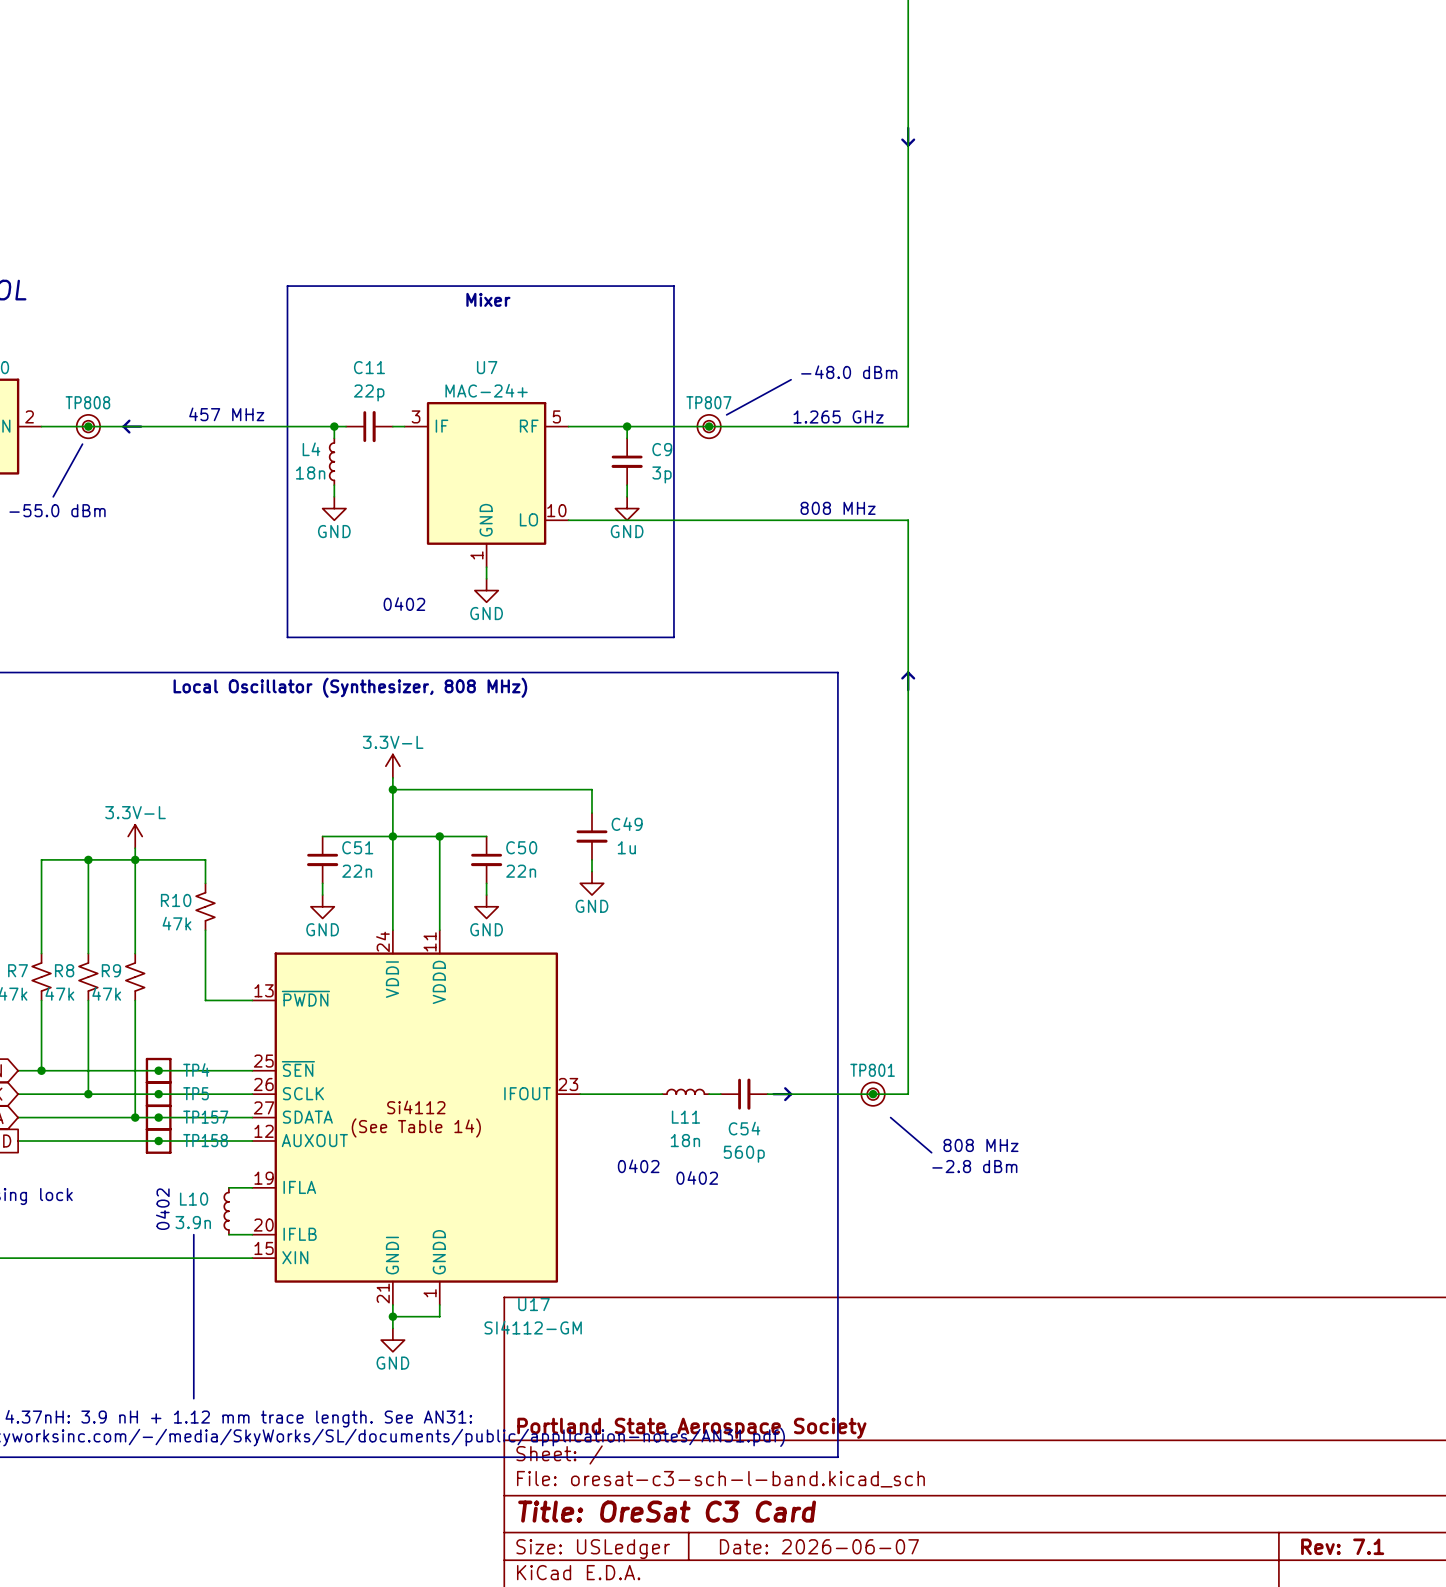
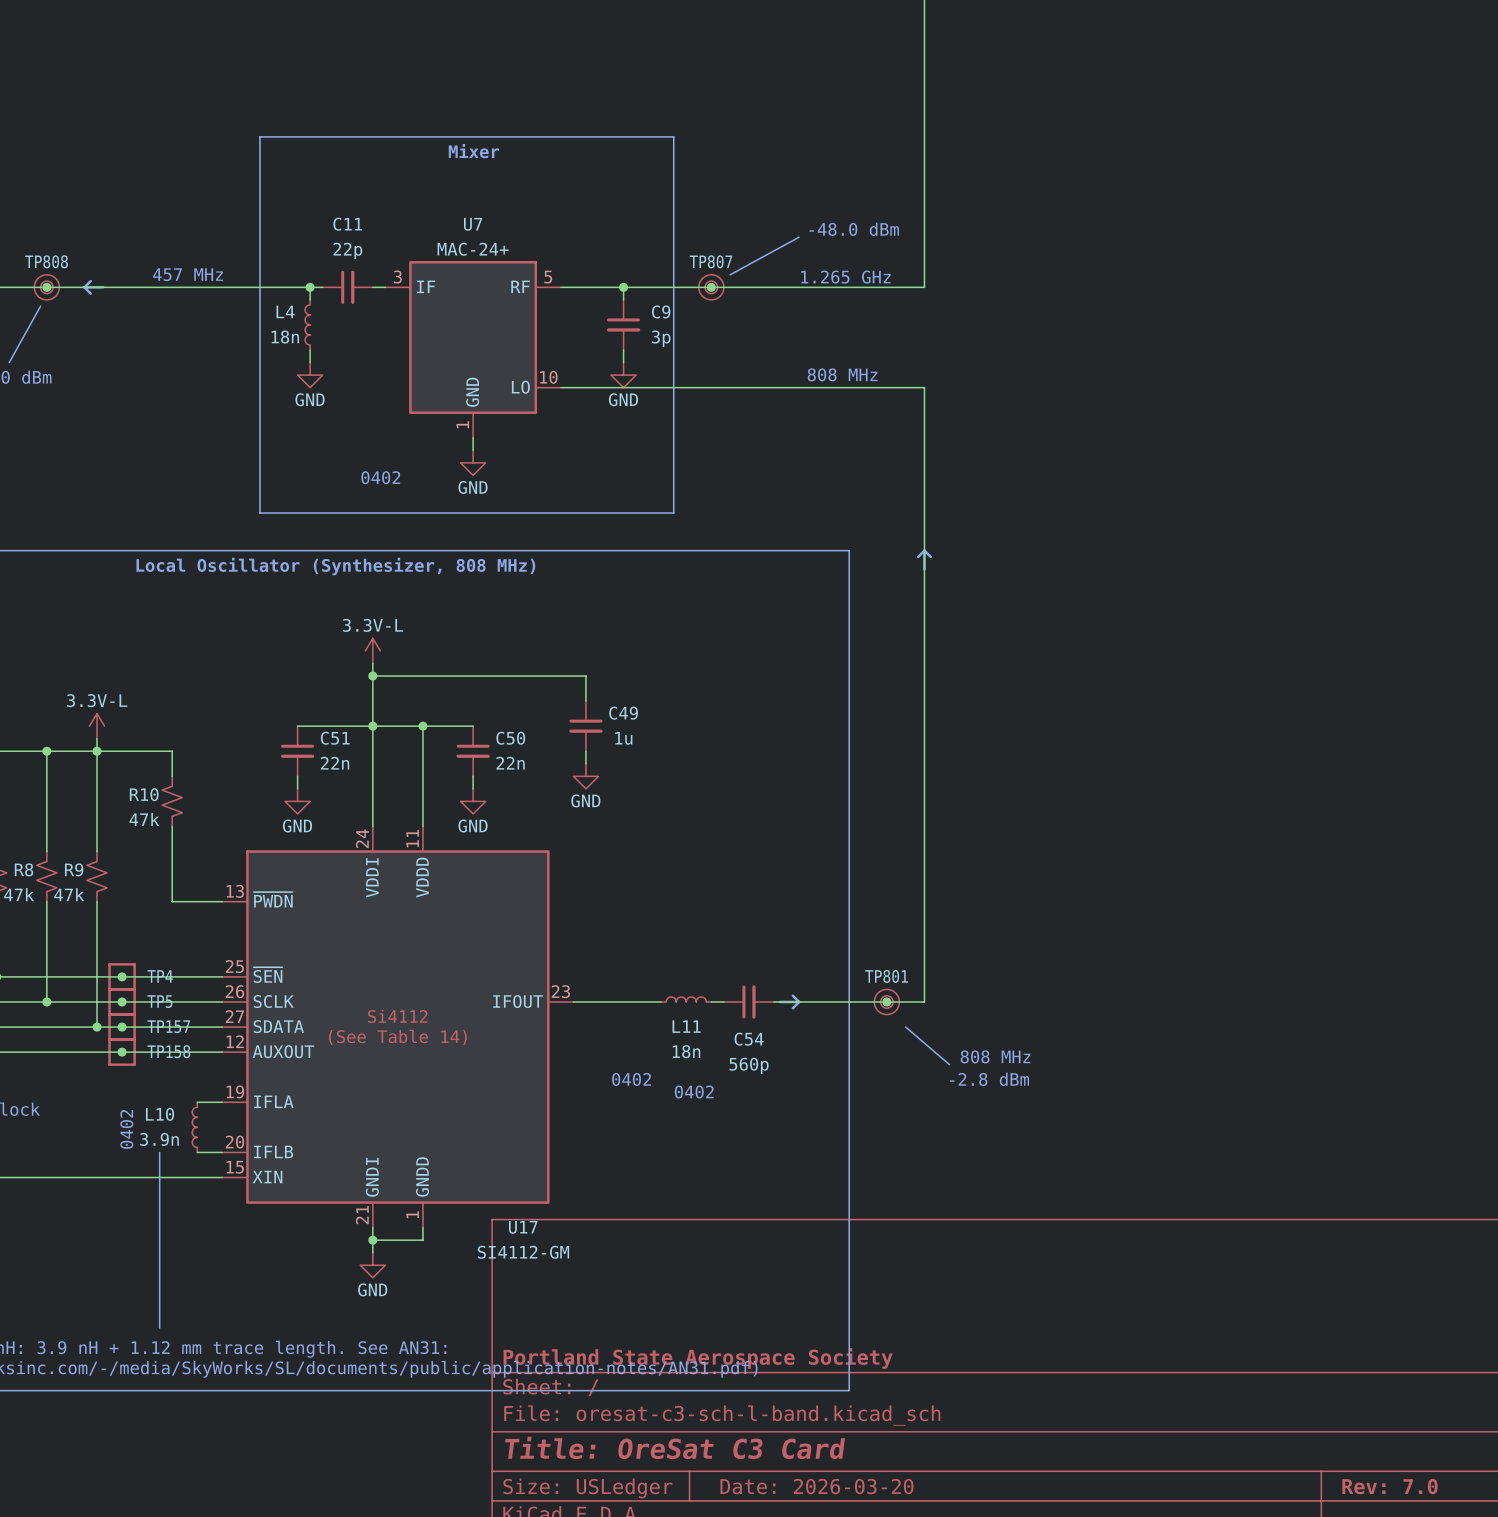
title block: Date: 2026-06-07 (819, 1546) -> Date: 2026-03-20 (816, 1486)
title block: Rev: 7.1 (1342, 1546) -> Rev: 7.0 (1390, 1486)

